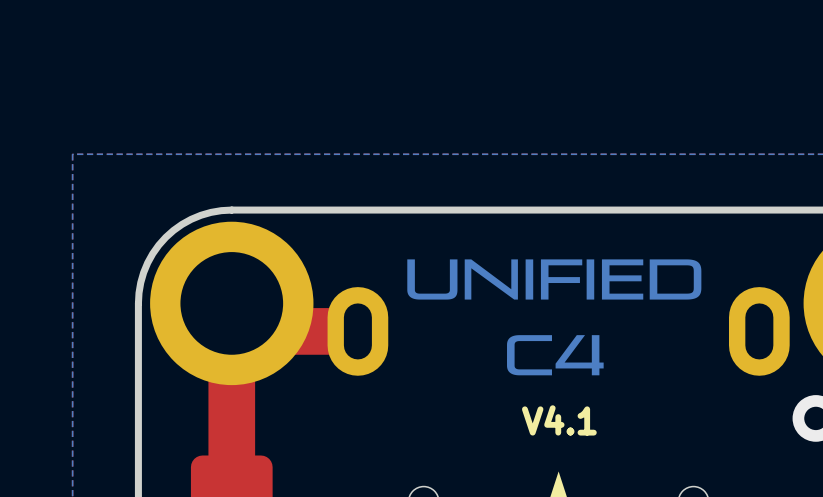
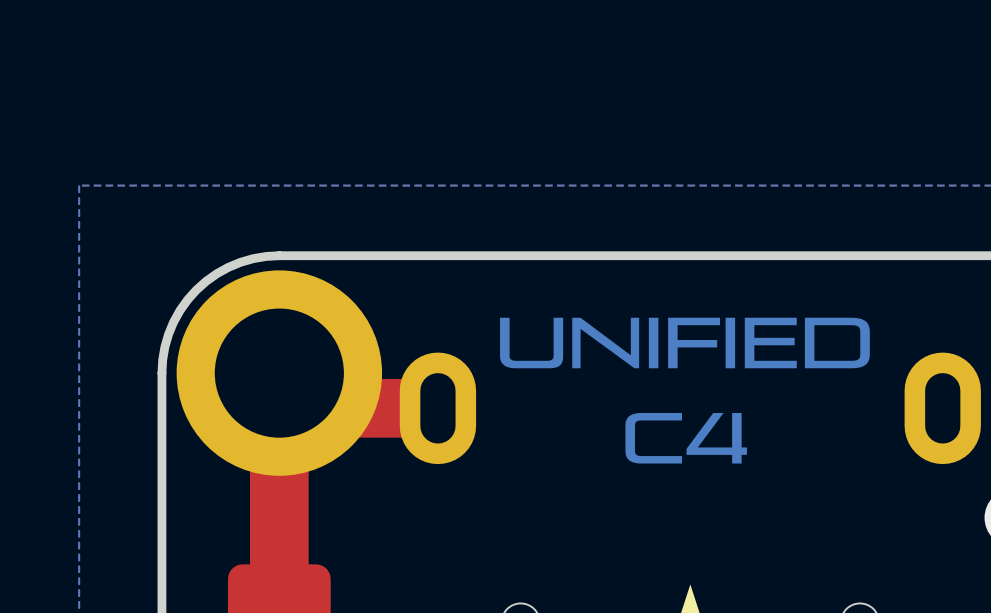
text: V4.1 (559, 420) -> none

